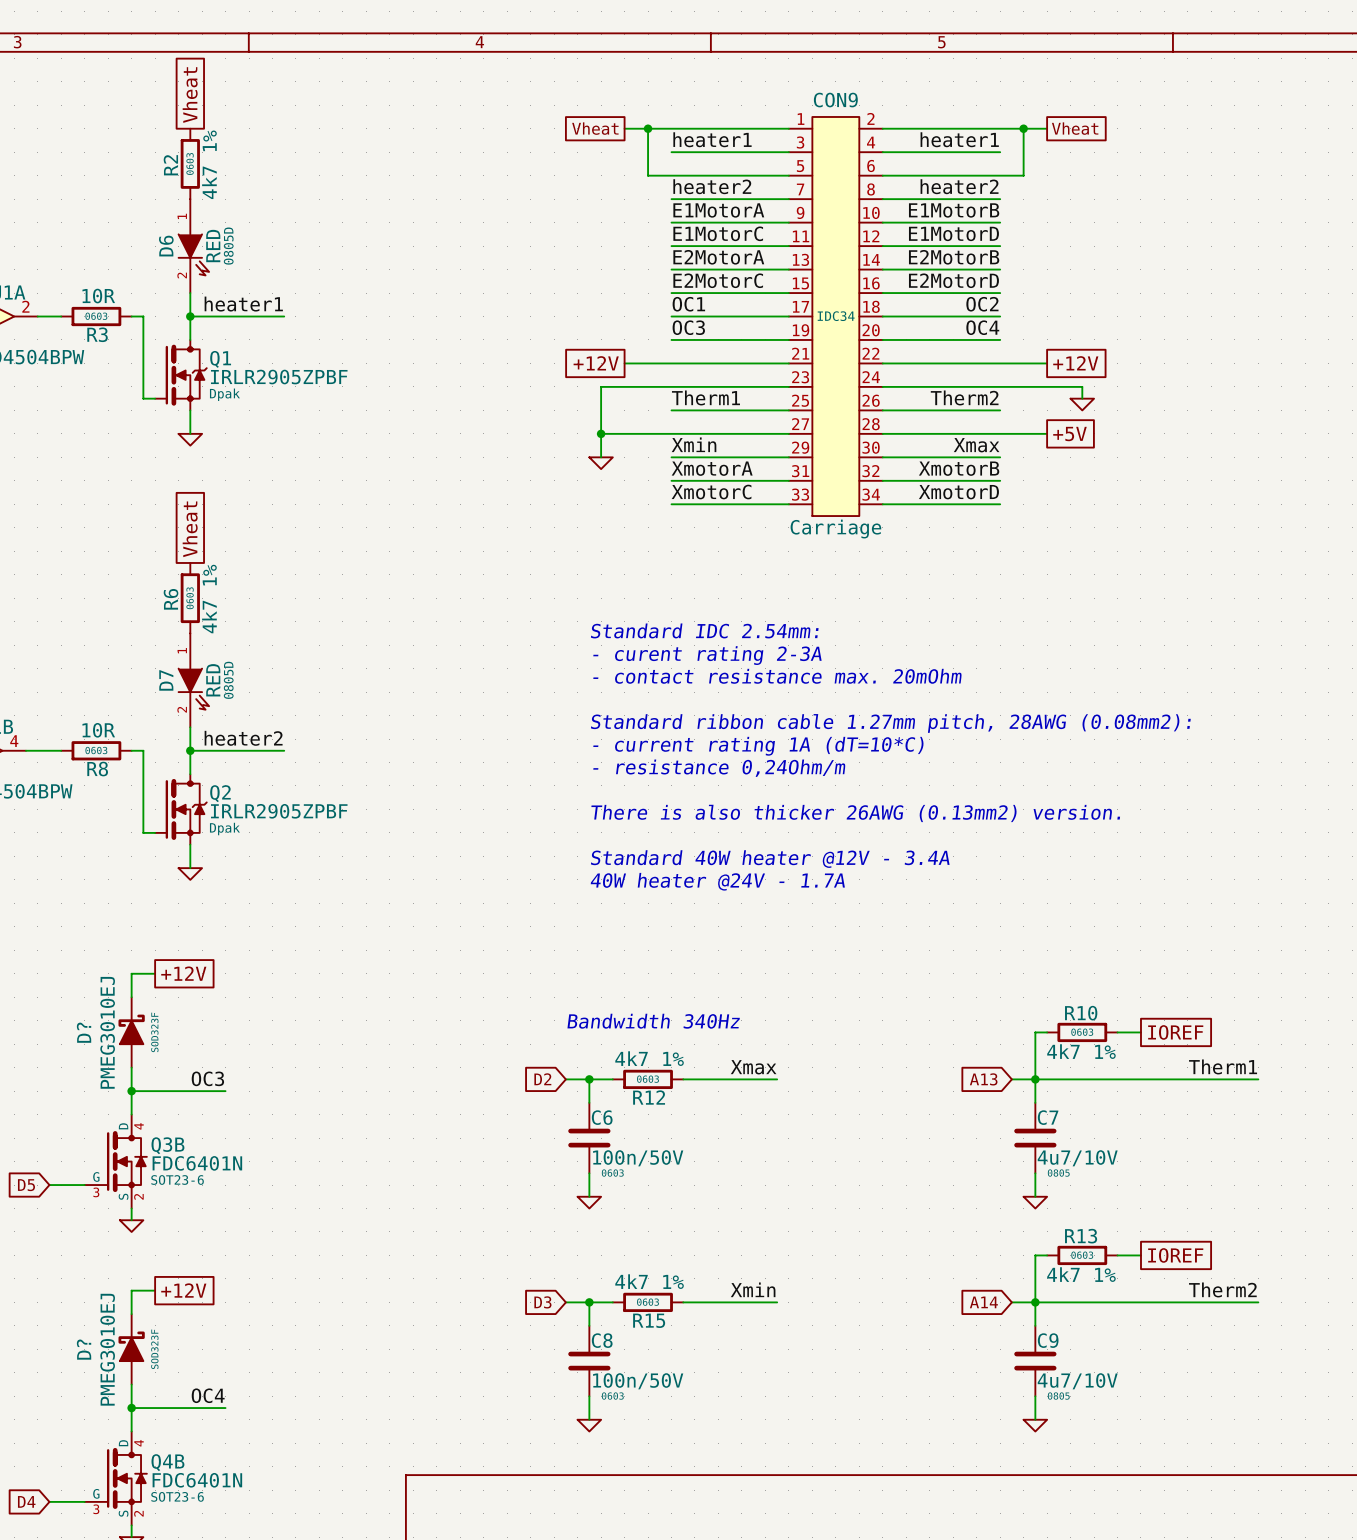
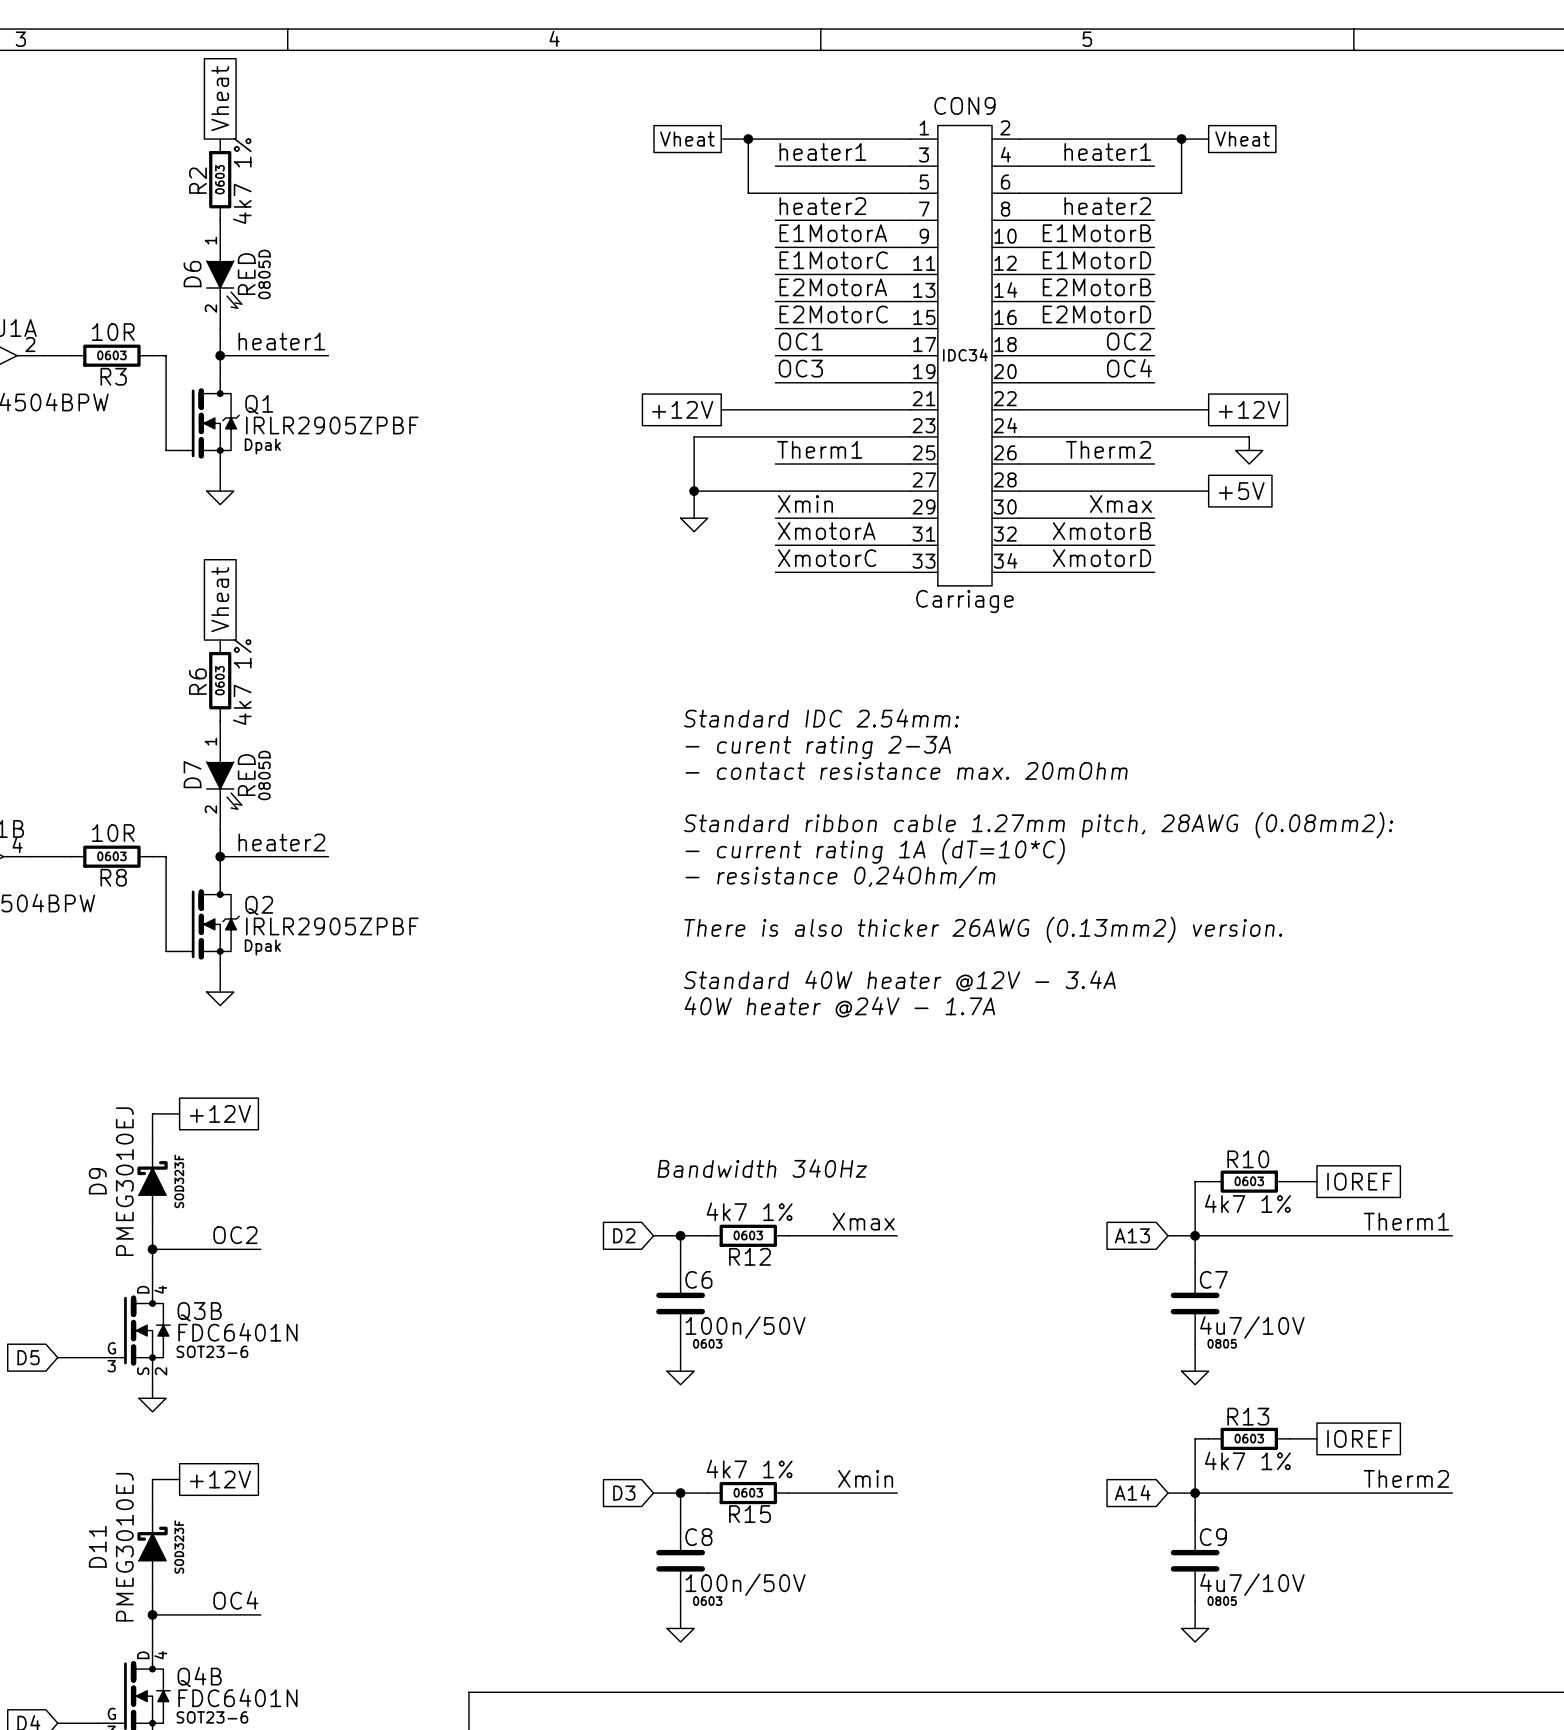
D? name: D? (84, 1032) -> D9 (97, 1181)
label: OC3 (207, 1078) -> OC2 (235, 1235)
D? name: D? (84, 1349) -> D11 (97, 1546)

